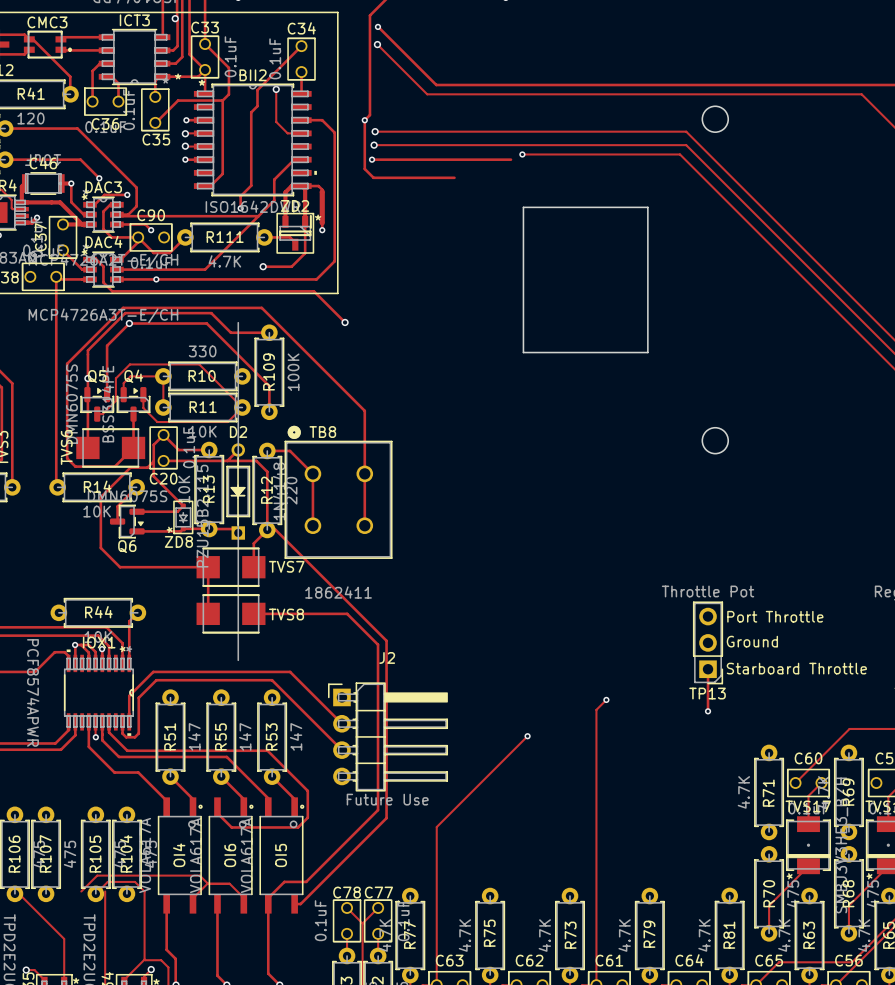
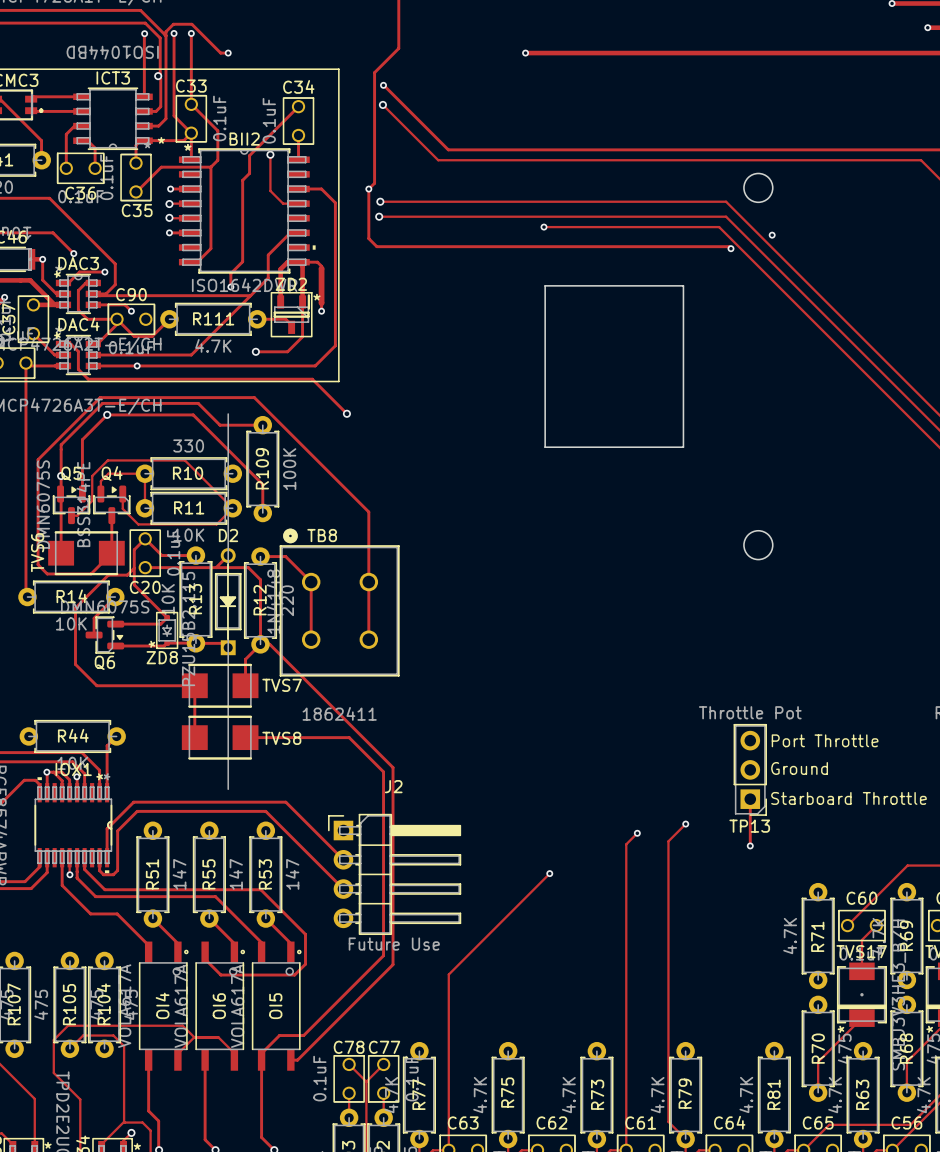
track: (372, 159) (510, 159) -> none
via: (372, 159) -> none
via: none -> (772, 235)
track: (364, 164) (364, 169) (373, 177) (454, 177) -> (368, 238) (376, 246) (728, 246) (730, 248)
via: none -> (730, 248)
track: none -> (685, 824) (668, 841) (668, 1121) (685, 1139)
via: none -> (685, 824)
track: (199, 875) (97, 875) (81, 891) -> (185, 1028) (182, 1025) (68, 1025) (53, 1039) (53, 1072) (80, 1099)
track: (105, 891) (105, 939) -> none

